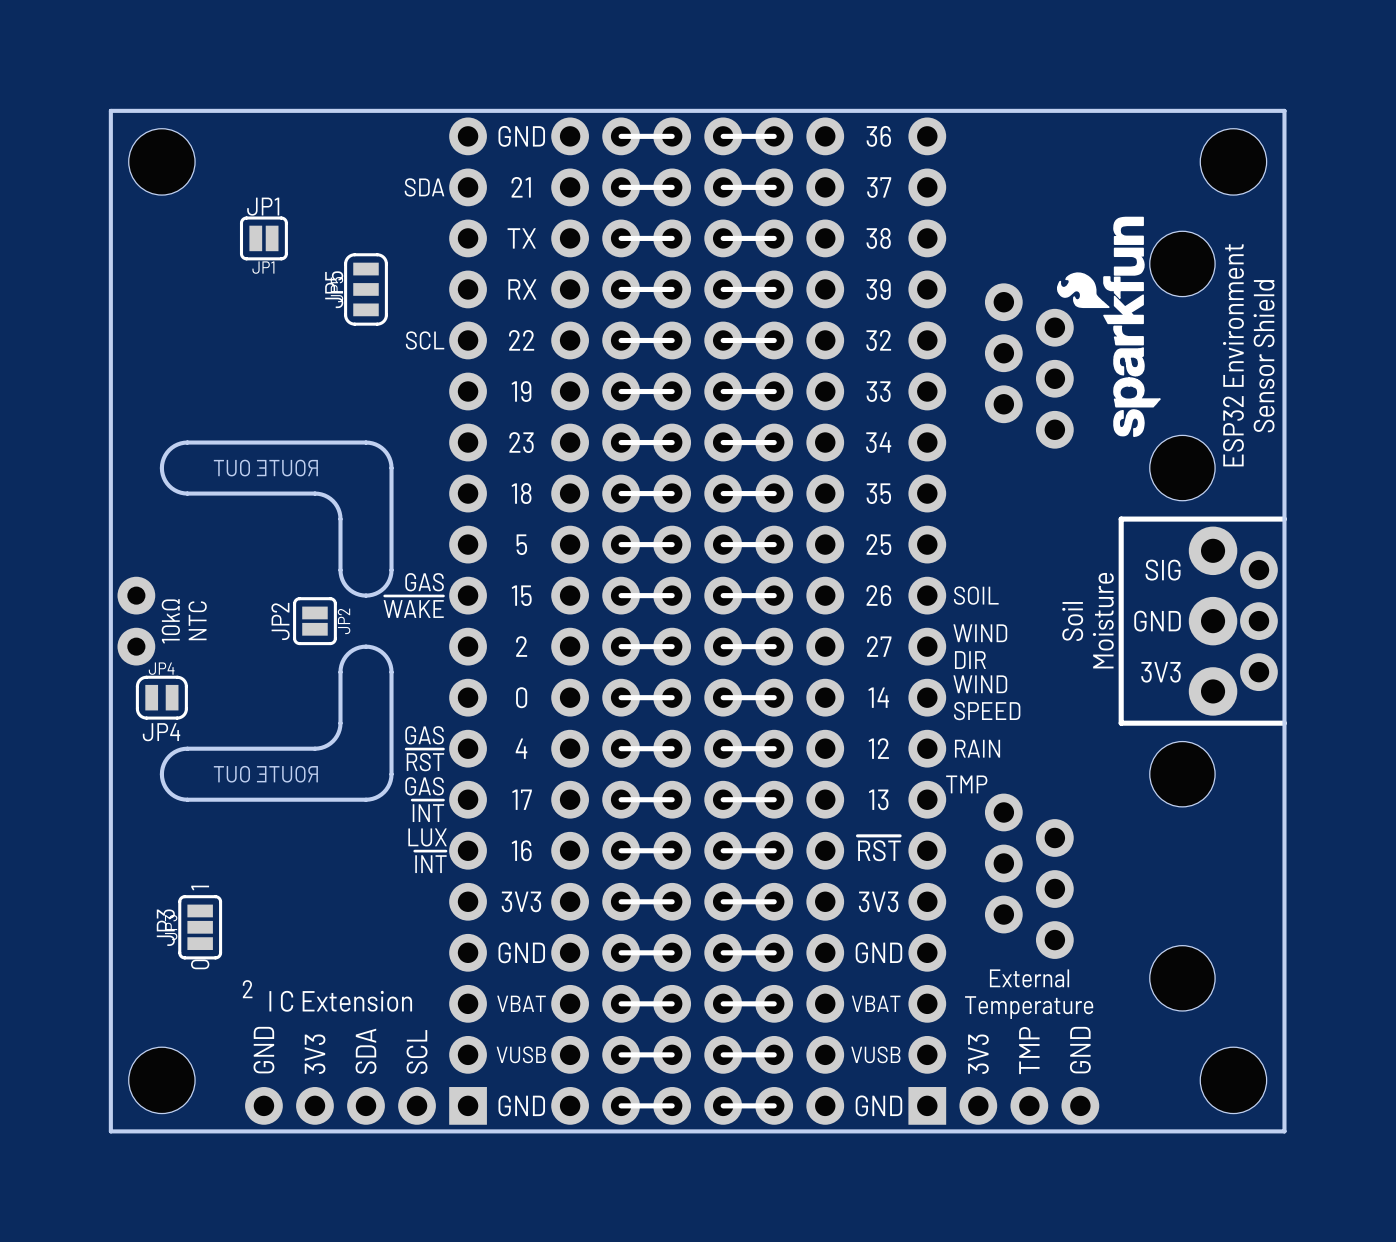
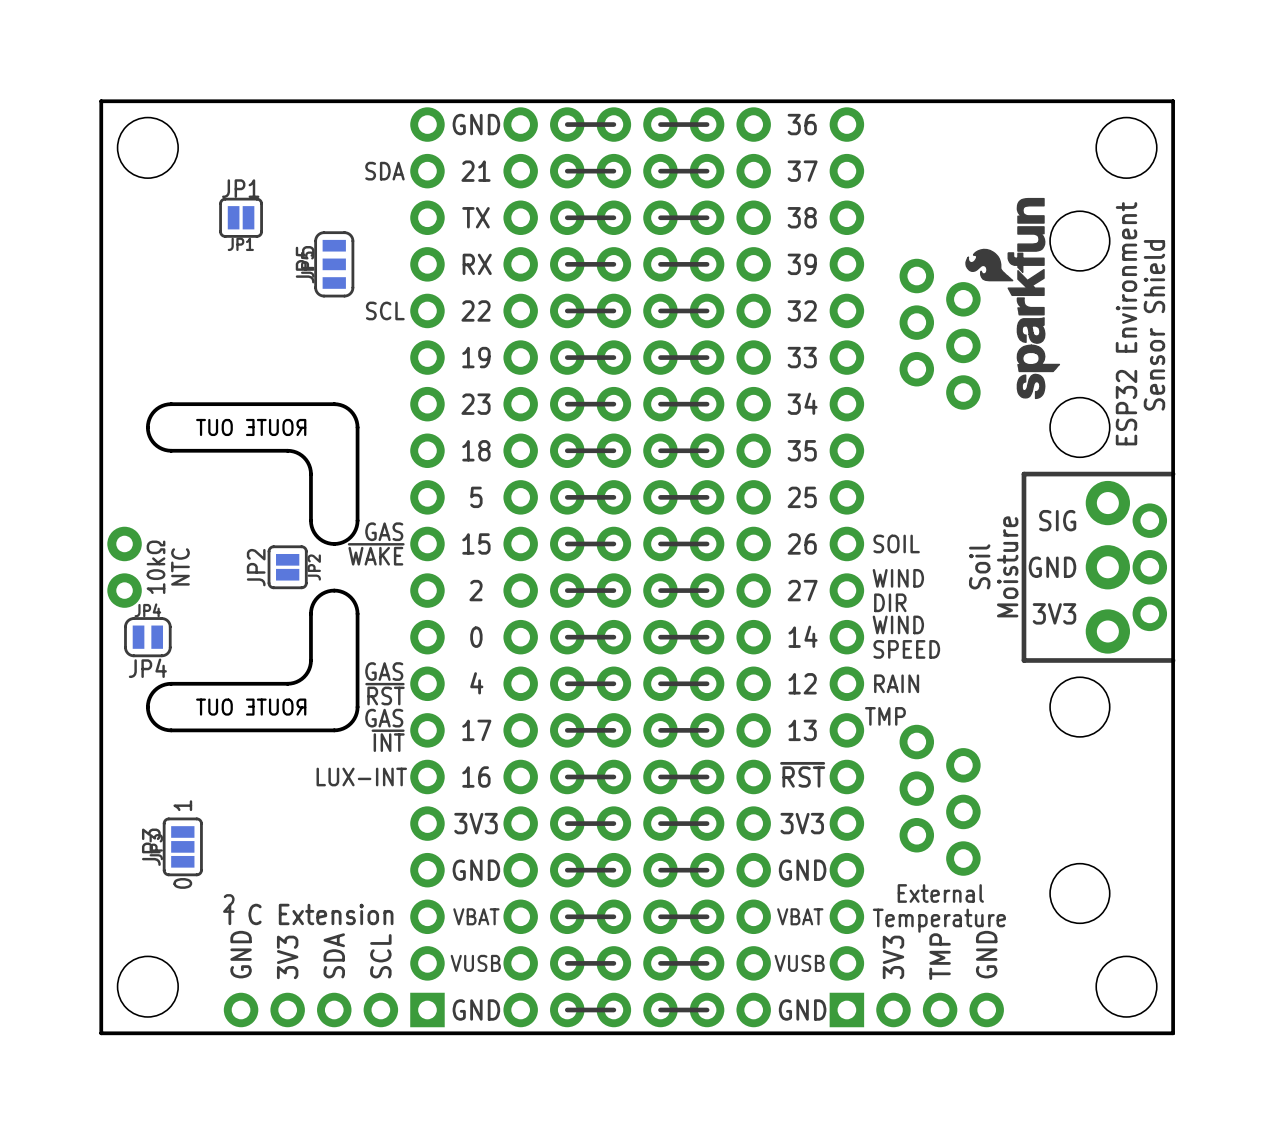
text: LUX (427, 837) -> none
text: none -> LUX-INT (361, 776)
text: ~{INT} (430, 862) -> none

